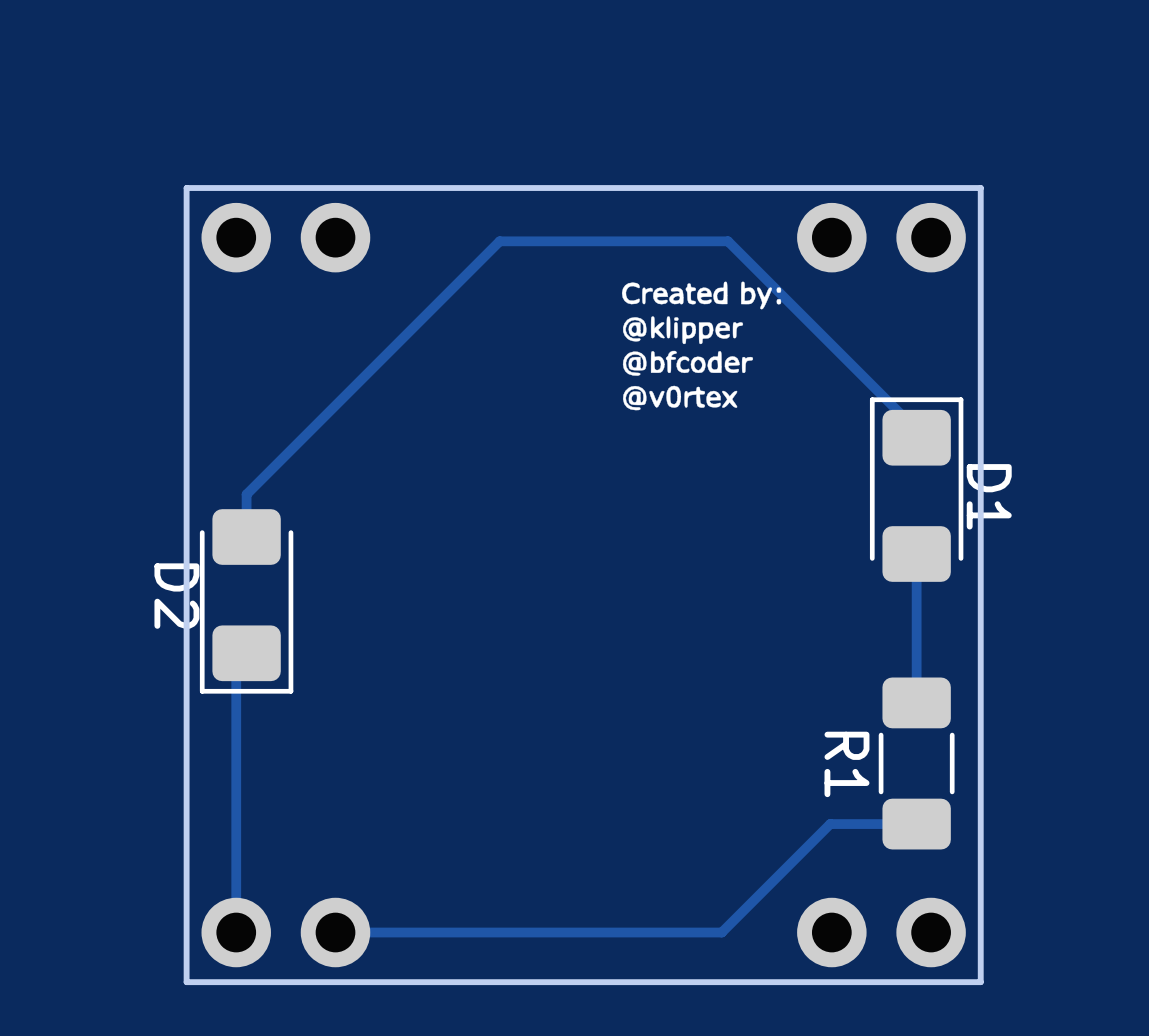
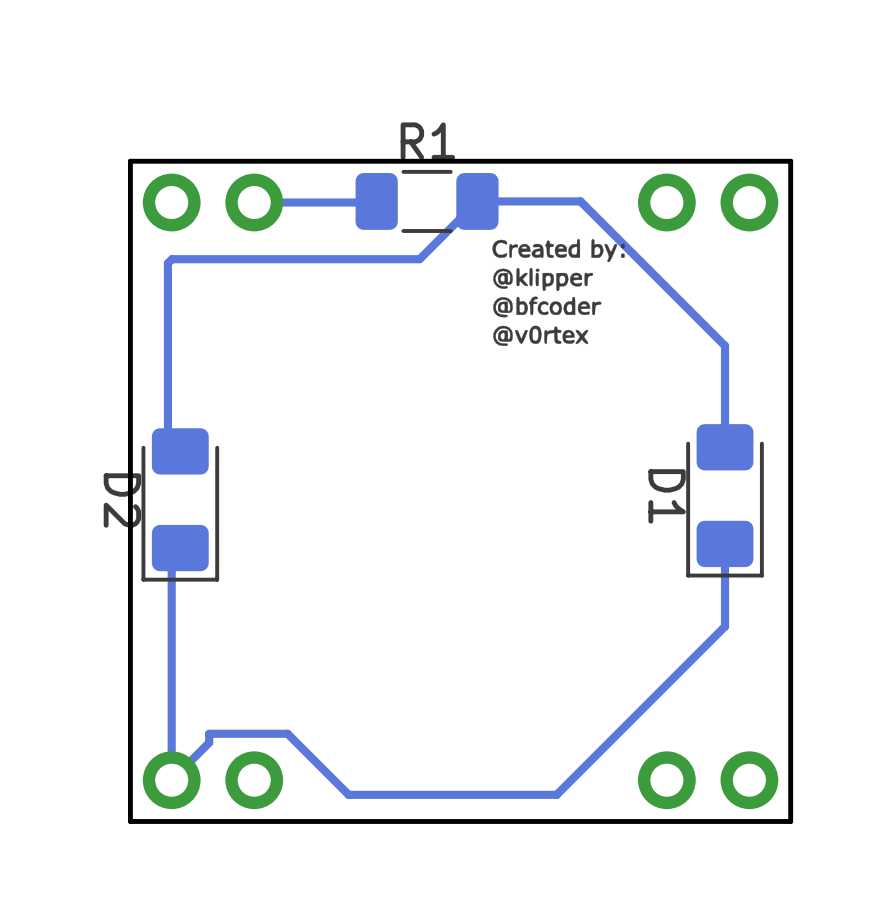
track: none -> (376, 201) (254, 202)
track: (916, 437) (916, 429) (728, 241) (499, 241) (246, 494) (246, 537) -> (725, 447) (725, 345) (580, 201) (477, 201) (419, 259) (172, 259) (167, 263) (167, 439) (180, 451)
D1 rotation: 0° (916, 489) -> 180° (725, 500)
track: (916, 554) (916, 702) -> none
track: none -> (725, 543) (725, 626) (556, 794) (348, 794) (287, 733) (209, 733) (209, 742) (171, 780)
R1 rotation: 0° (916, 763) -> 90° clockwise (427, 201)
R1 position: (916, 763) -> (427, 201)
track: (916, 824) (830, 824) (721, 932) (335, 932) -> none

